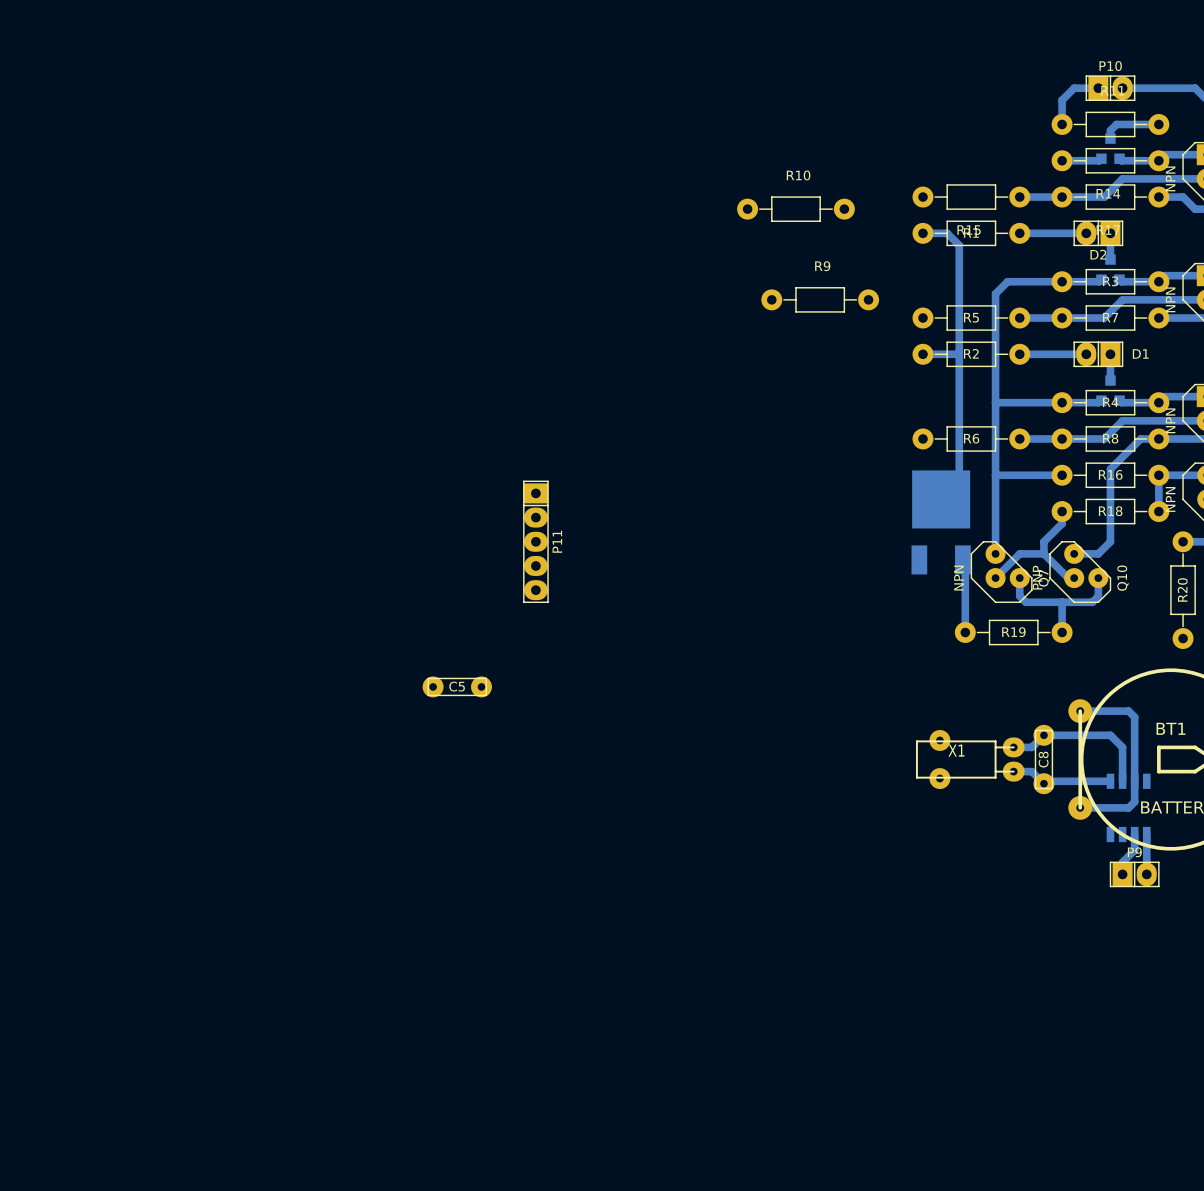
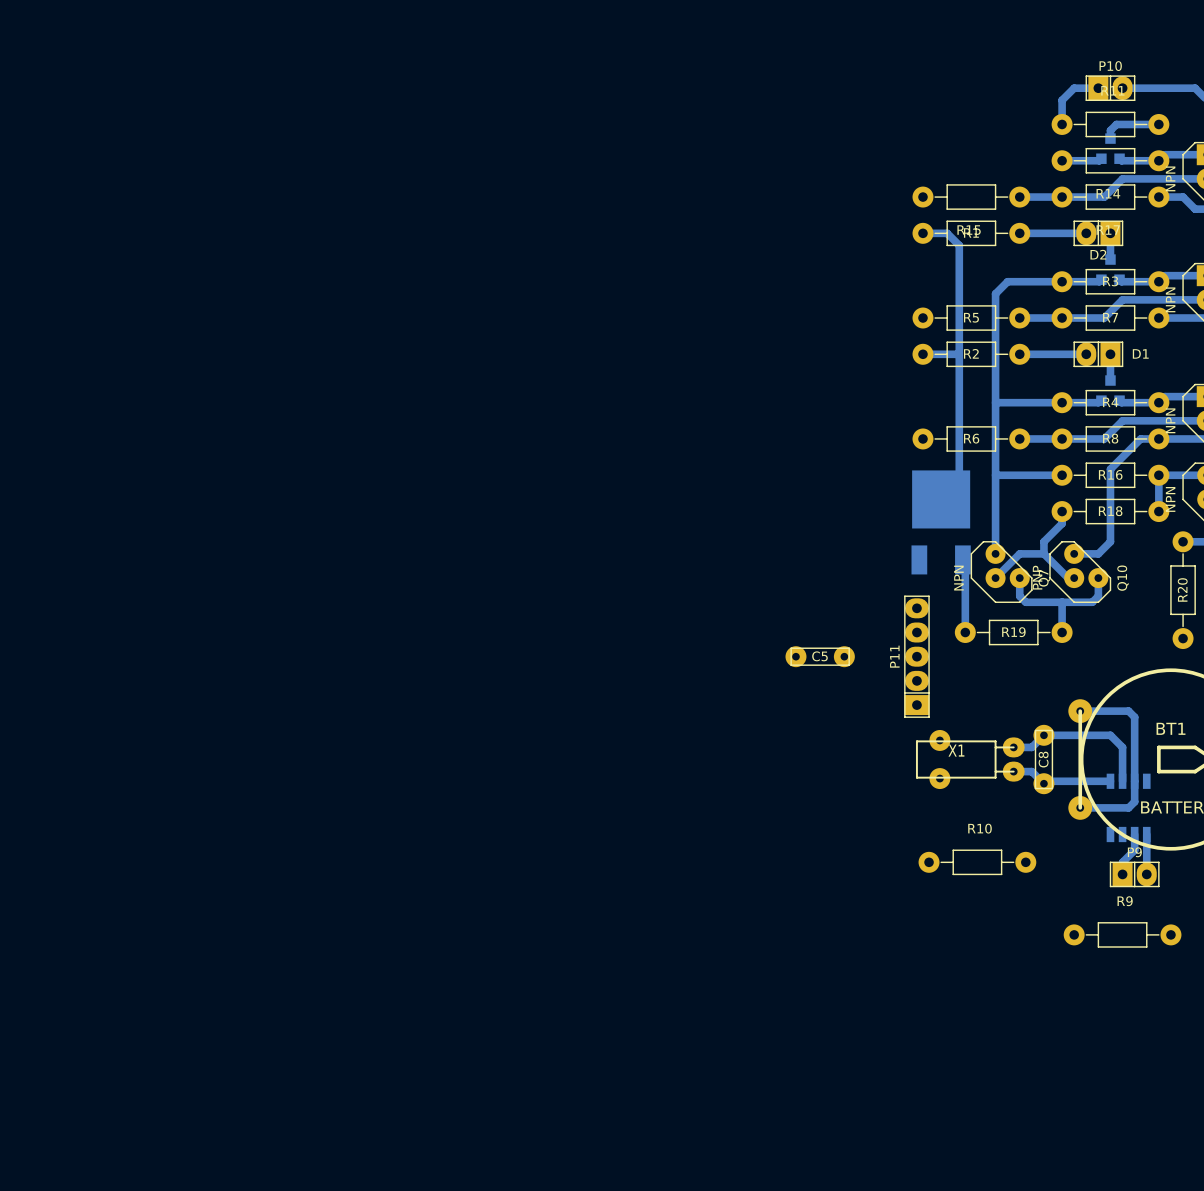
R10 position: (795, 209) -> (977, 862)
R9 position: (820, 299) -> (1122, 934)
P11 rotation: 0° (535, 541) -> 180° (916, 656)
P11 position: (535, 541) -> (916, 656)
C5 position: (457, 686) -> (820, 656)

